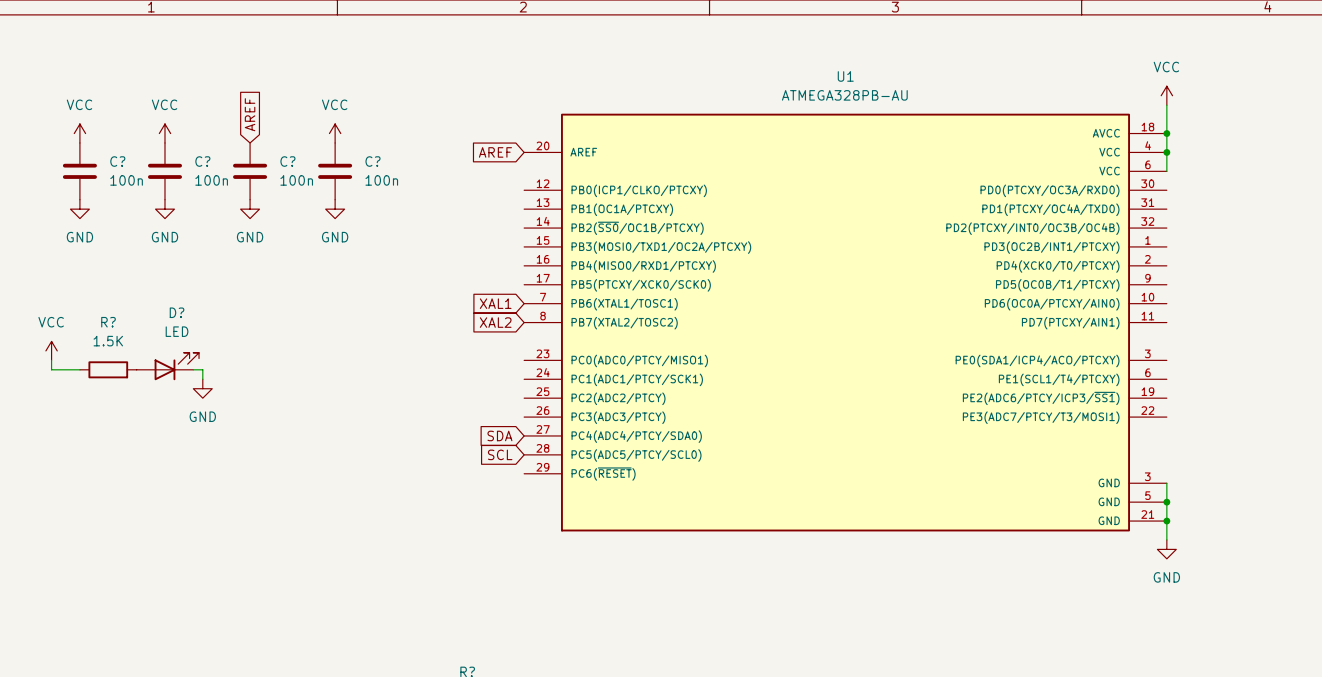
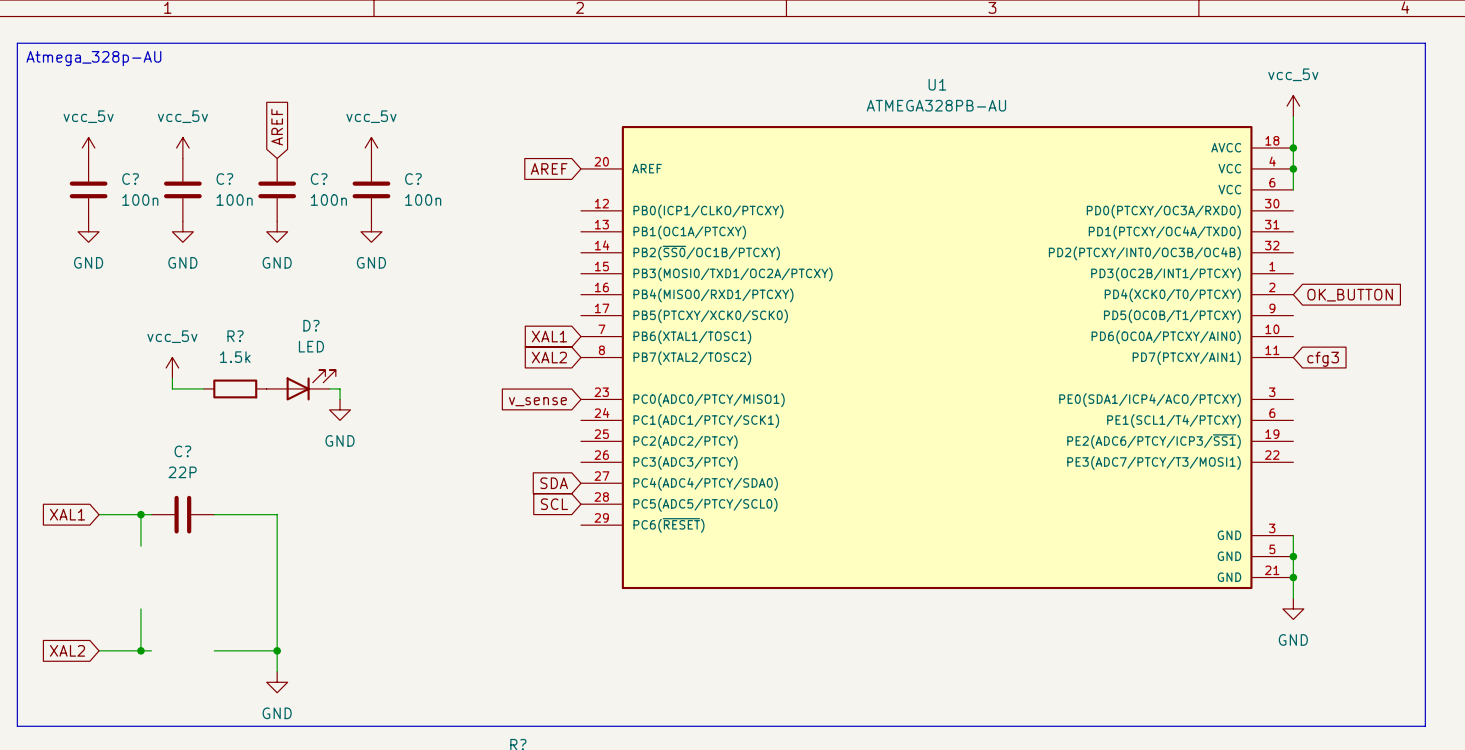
line: none -> (17, 43) (1425, 43) (1425, 726) (17, 726) (17, 43)
text: none -> Atmega_328p-AU (93, 58)
power symbol: VCC (1166, 95) -> vcc_5v (1293, 106)
power symbol: VCC (79, 133) -> vcc_5v (88, 148)
power symbol: VCC (164, 133) -> vcc_5v (182, 148)
power symbol: VCC (335, 133) -> vcc_5v (371, 148)
global label: none -> OK_BUTTON (1350, 295)
global label: none -> cfg3 (1323, 359)
power symbol: none -> vcc_5v (172, 368)
power symbol: VCC (51, 350) -> none
R?: none -> 1.5k (235, 388)
wire: (51, 360) (51, 369) (79, 369) -> (172, 378) (172, 388) (203, 388)
global label: none -> v_sense (537, 401)
D? position: (167, 366) -> (301, 385)
R?: 1.5K (108, 369) -> none
wire: (193, 369) (202, 369) (202, 379) -> (329, 388) (340, 388) (340, 399)
power symbol position: GND (202, 388) -> GND (340, 409)
global label: none -> XAL1 (67, 514)
wire: none -> (99, 514) (151, 514)
wire: none -> (140, 514) (140, 546)
junction: none -> (140, 514)
C?: none -> 22P (182, 514)
wire: none -> (214, 514) (277, 514) (277, 671)
wire: none -> (140, 608) (140, 650)
global label: none -> XAL2 (67, 650)
wire: none -> (99, 650) (151, 650)
junction: none -> (140, 650)
wire: none -> (214, 650) (277, 650)
junction: none -> (277, 650)
power symbol: none -> GND (277, 682)

